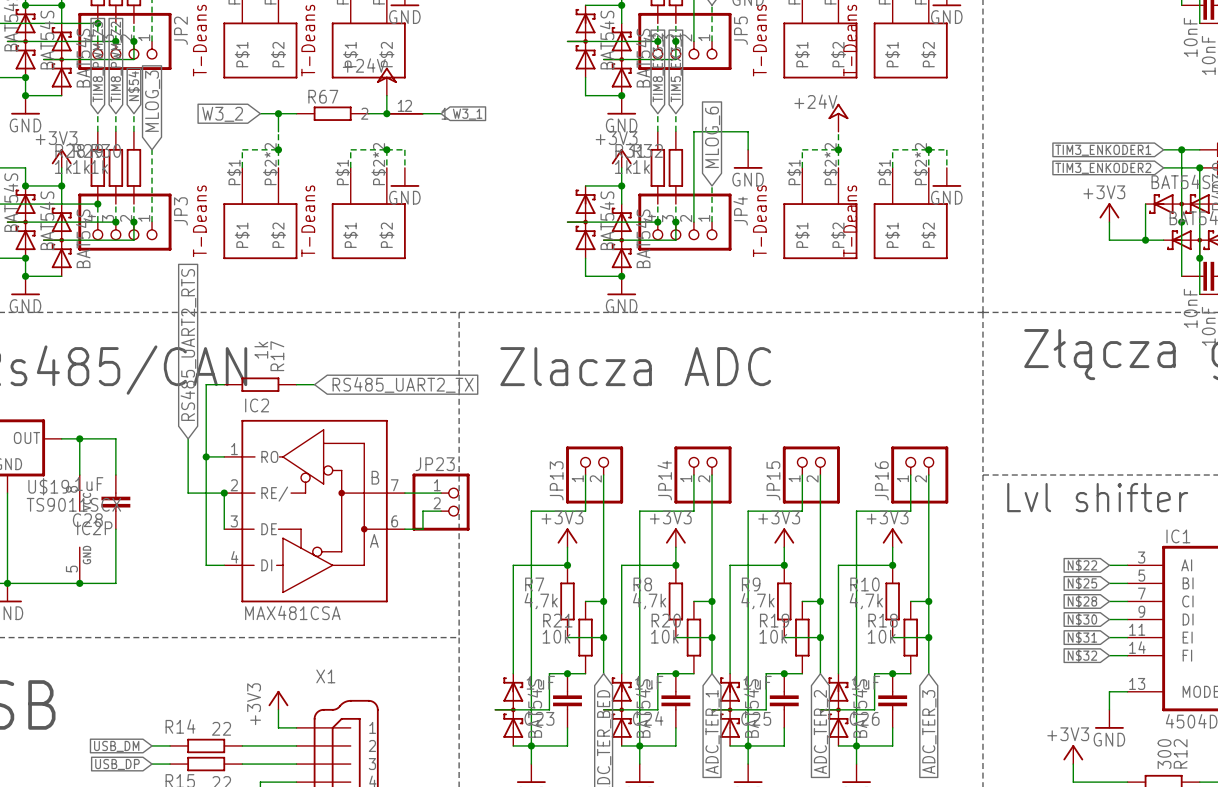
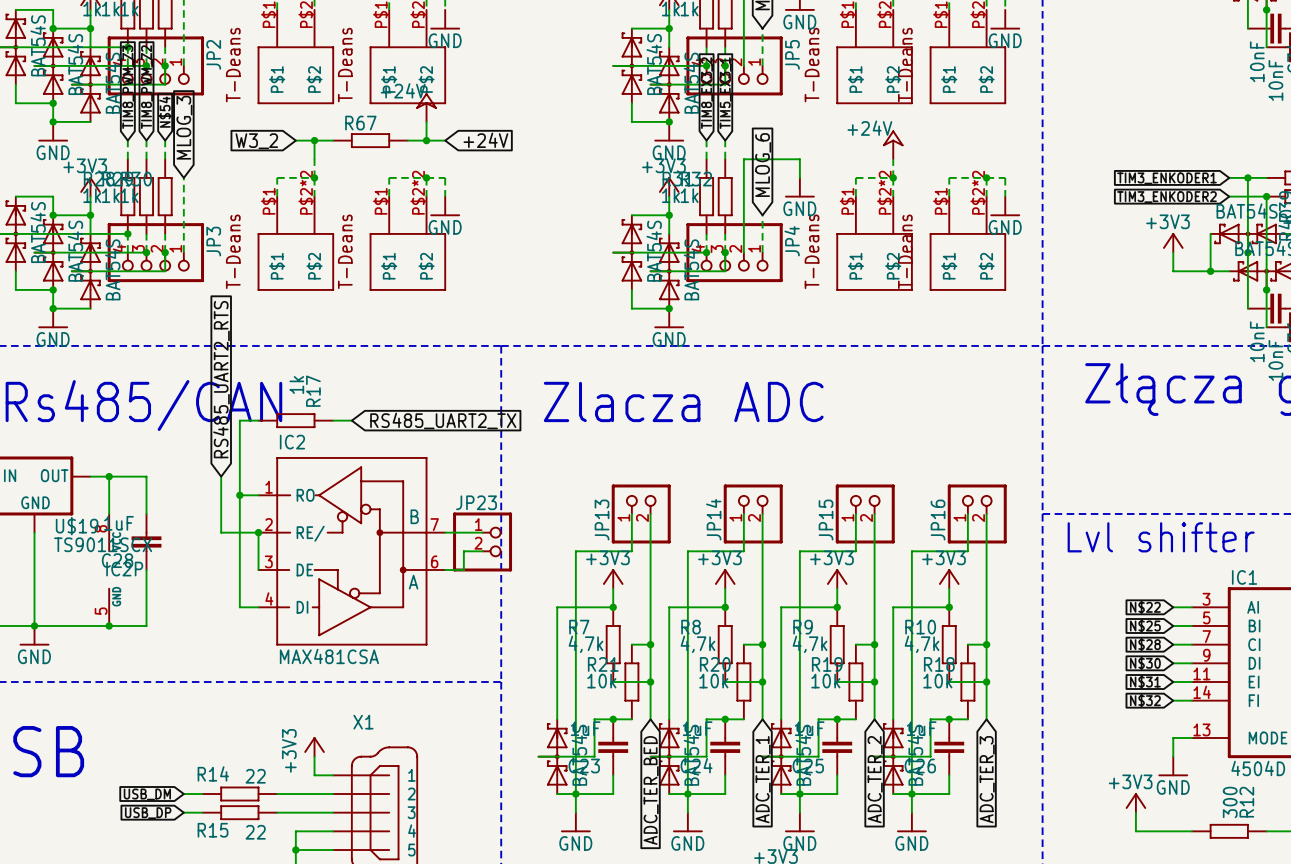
part: (404, 113) -> none
global label: none -> +24V (485, 140)
global label: W3_1 (467, 114) -> none

